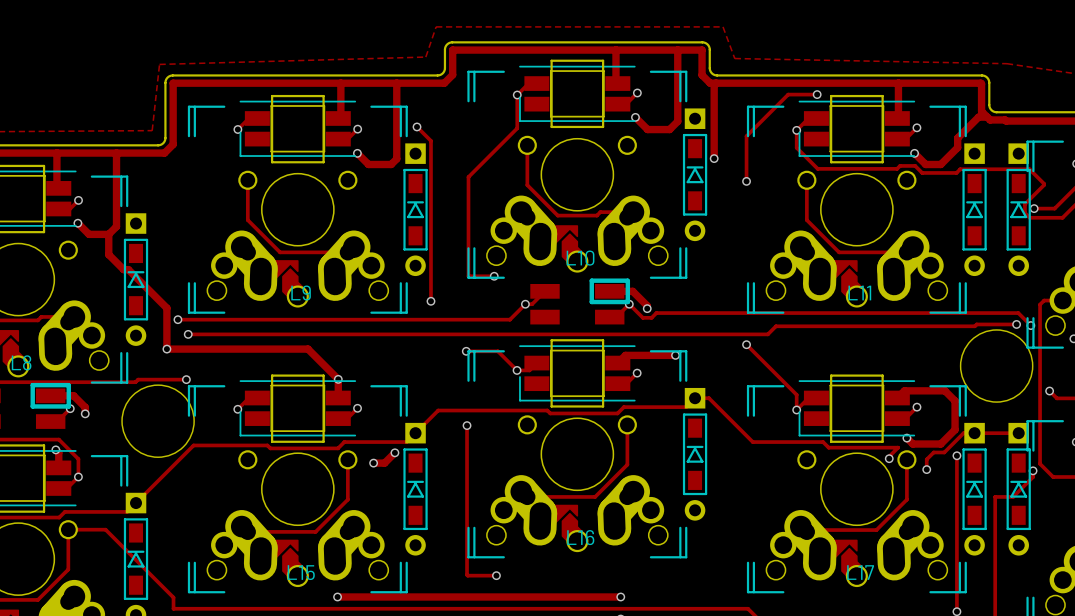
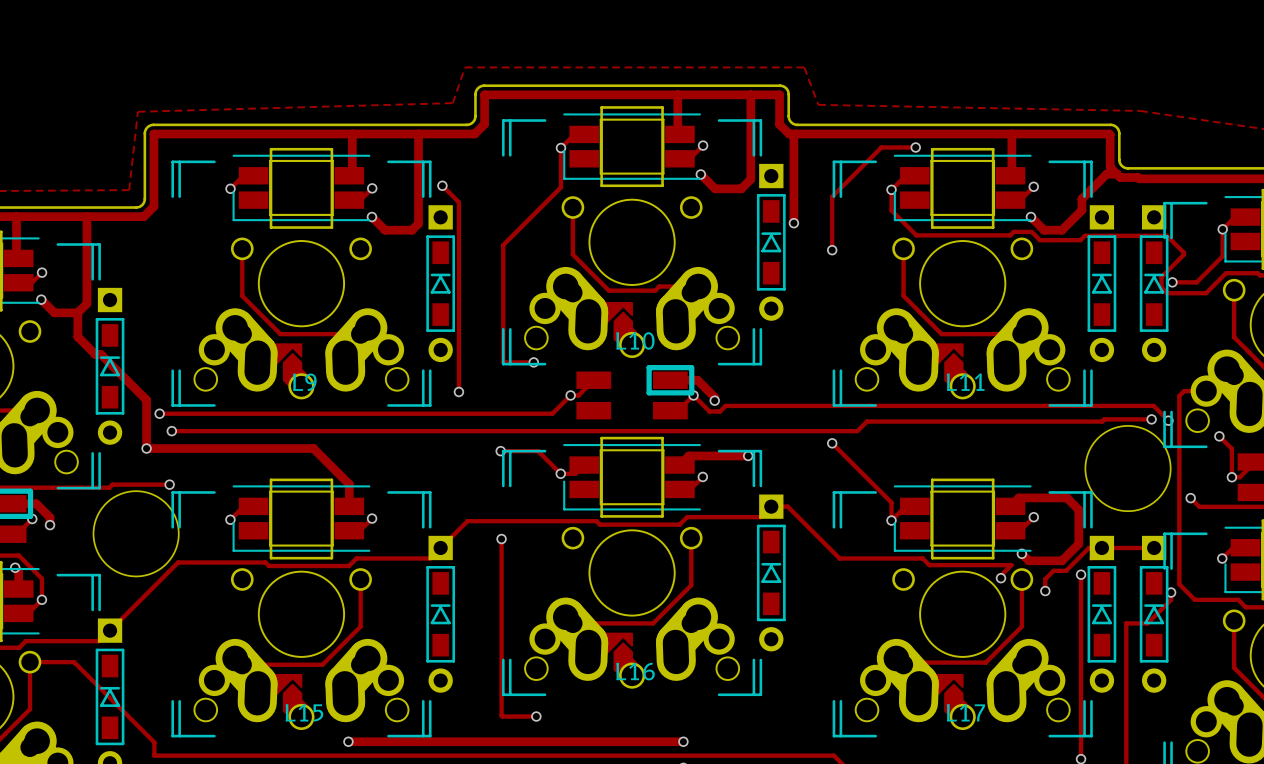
via: (338, 379) -> none
track: (394, 452) (384, 463) (373, 463) -> none
via: (394, 452) -> none
via: (373, 463) -> none

